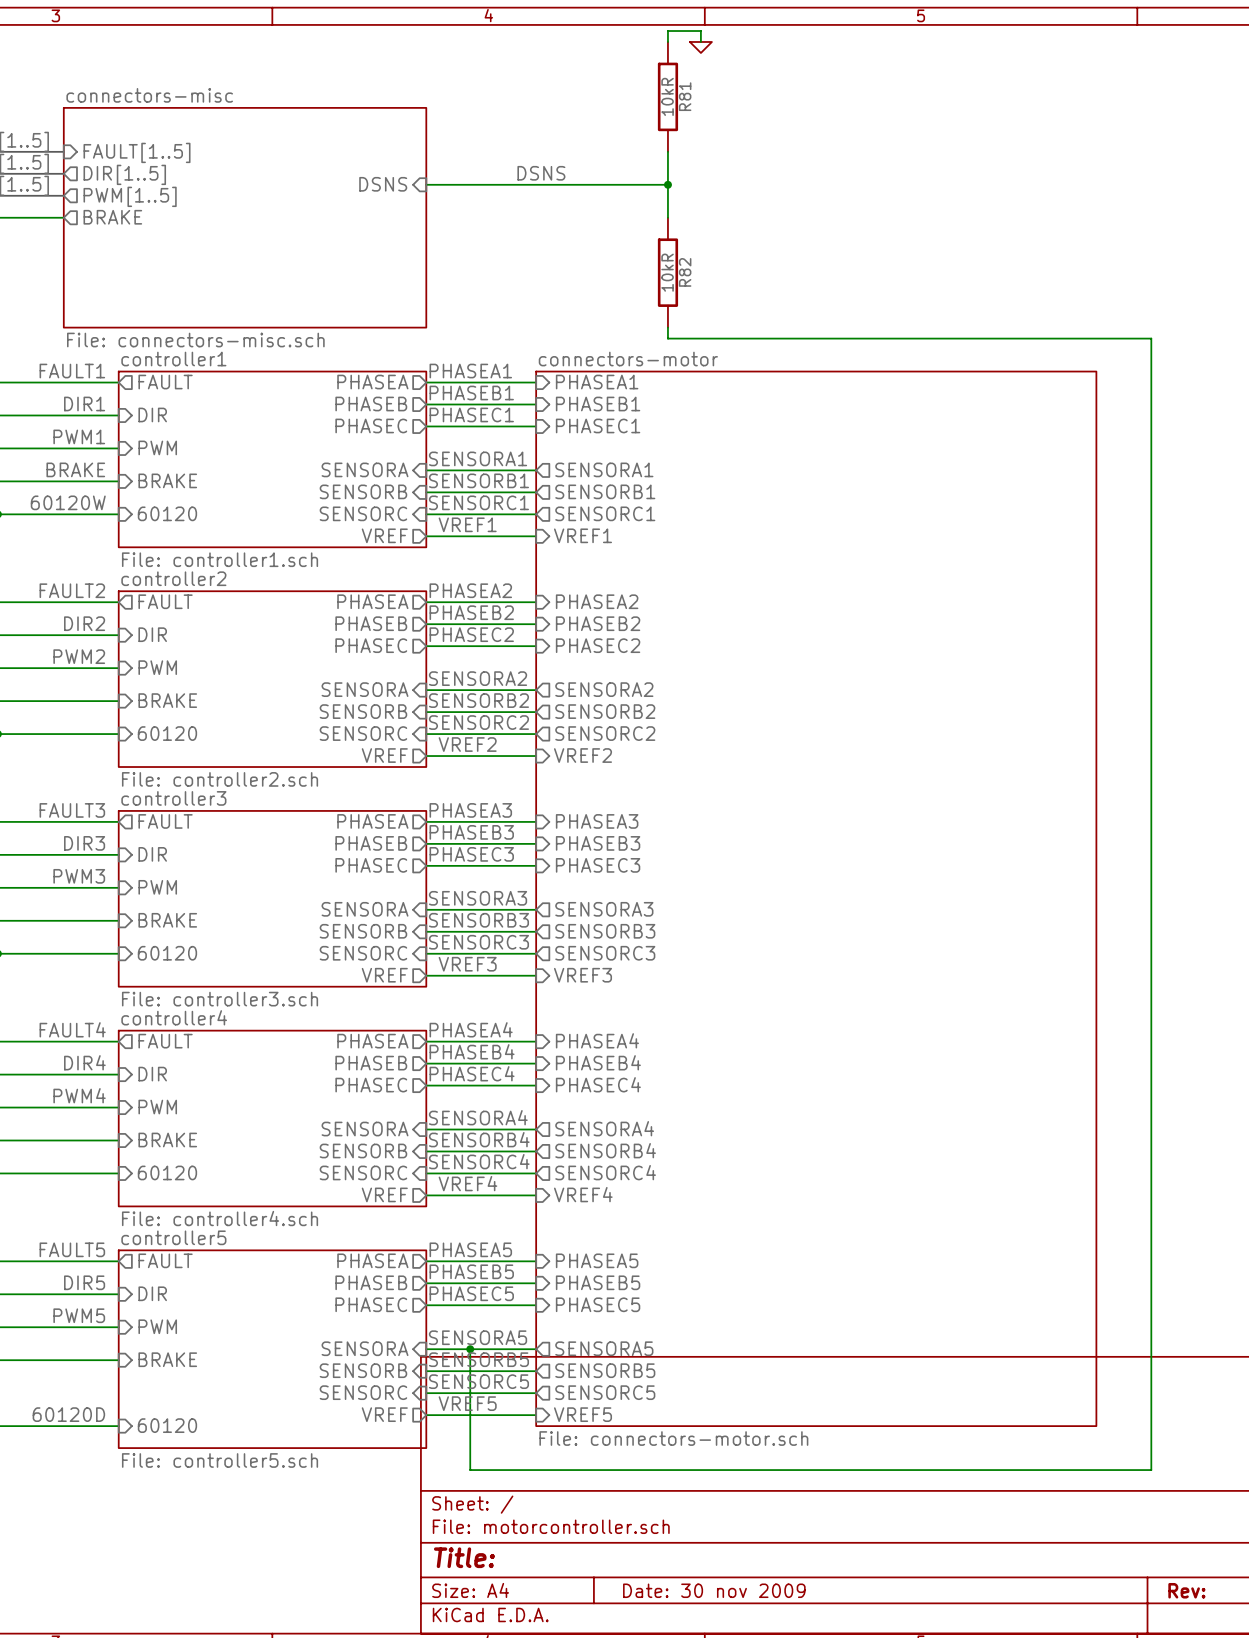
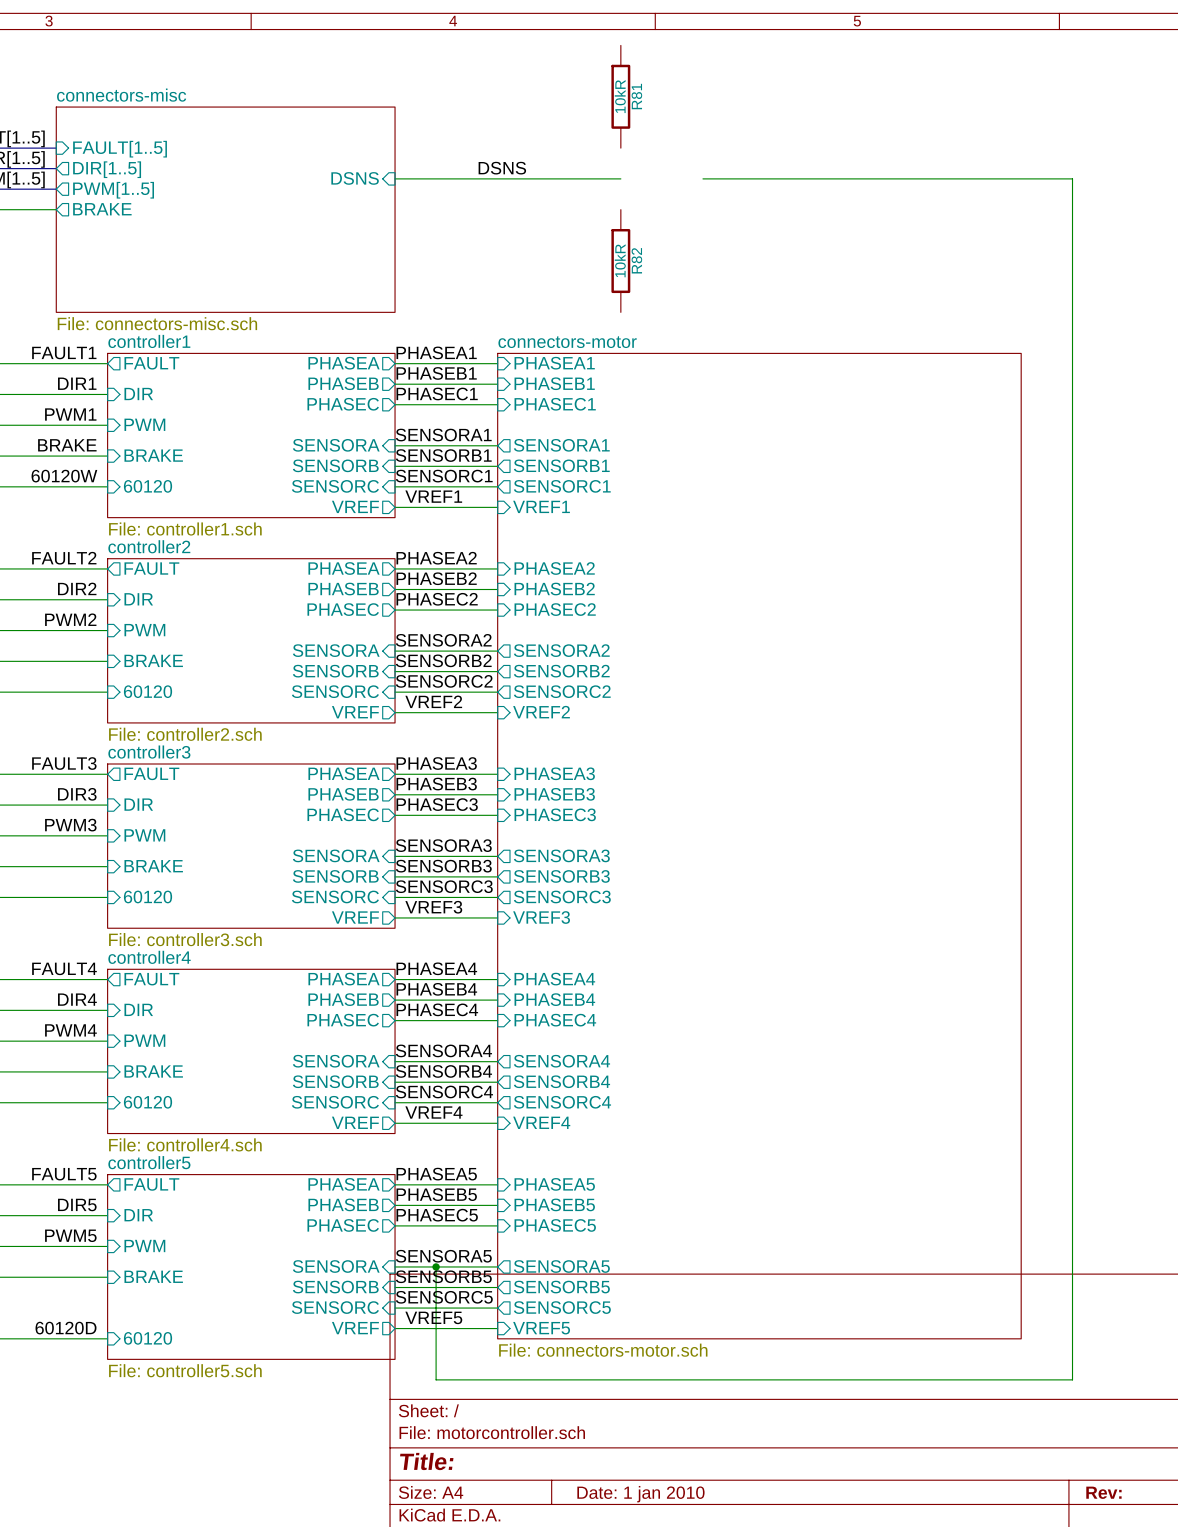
wire: (667, 41) (667, 31) (700, 31) (700, 41) -> none
power symbol: (700, 47) -> none
wire: (667, 151) (667, 217) -> none
junction: (667, 184) -> none
wire: (667, 327) (667, 338) (1151, 338) -> (702, 178) (1072, 178) (1072, 322)
title block: Date: 30 nov 2009 (714, 1590) -> Date: 1 jan 2010 (640, 1494)

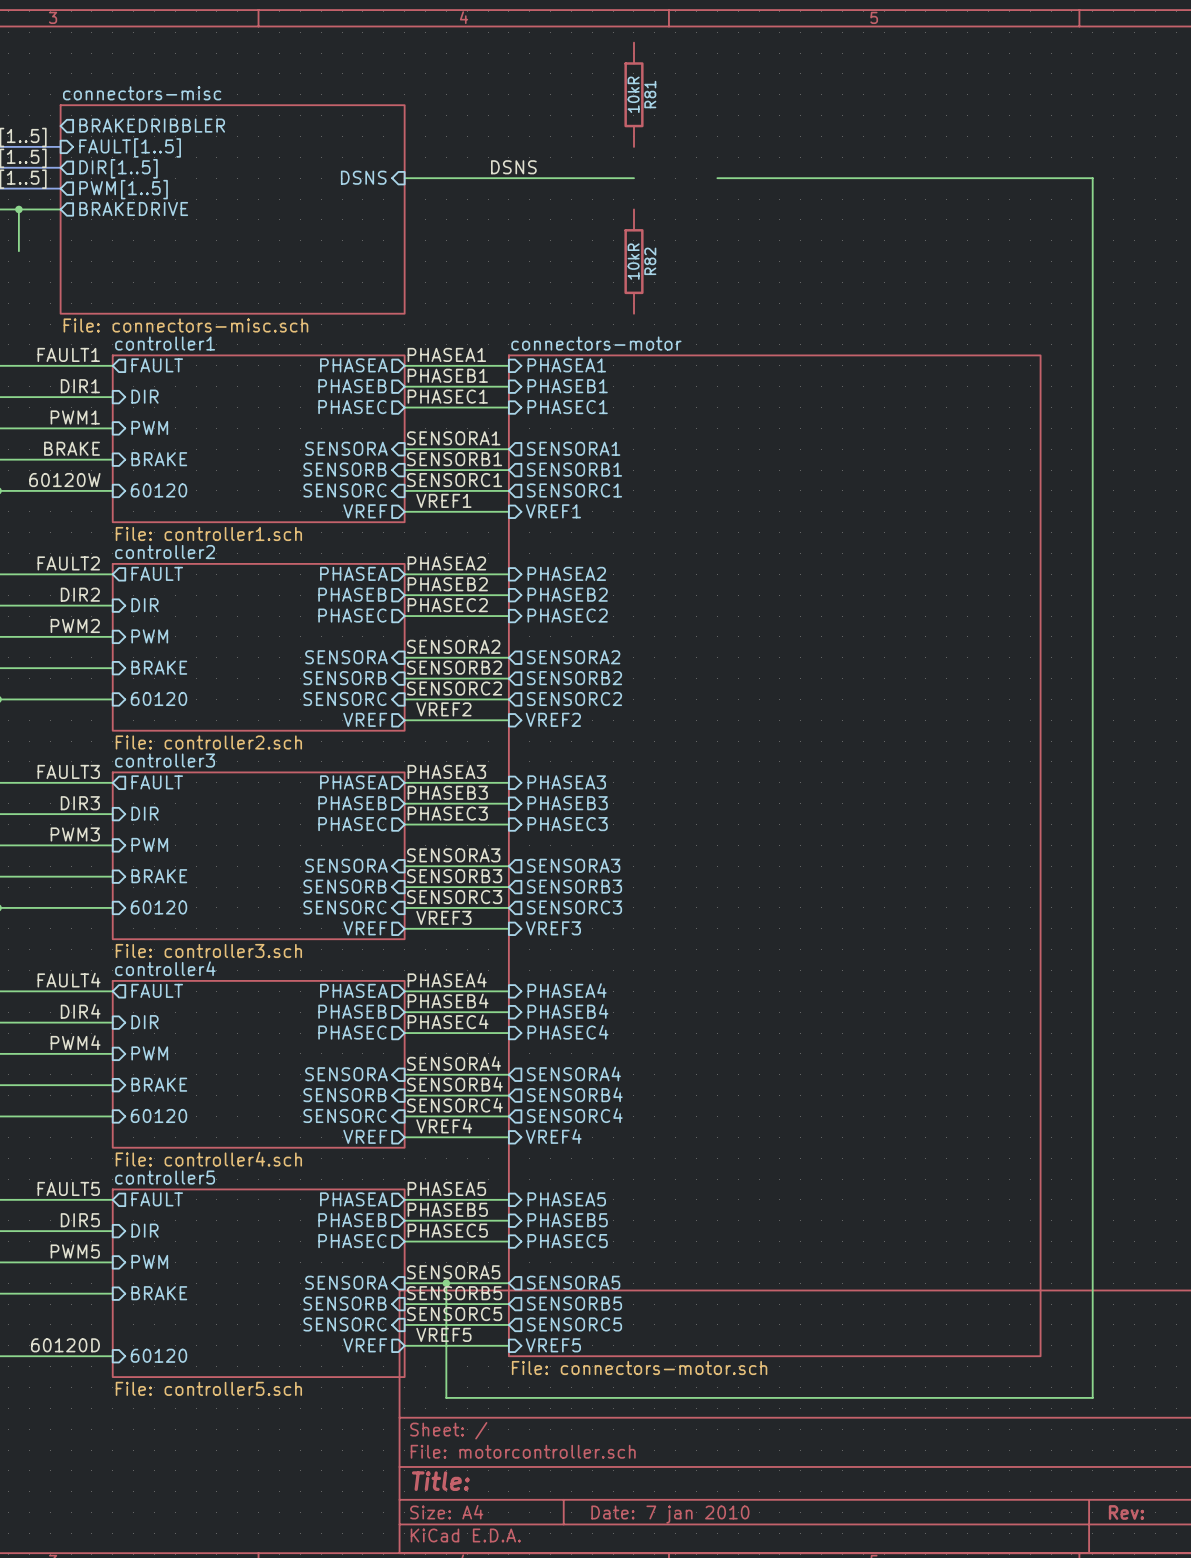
sheet pin: none -> BRAKEDRIBBLER (152, 125)
wire: none -> (18, 209) (18, 251)
junction: none -> (18, 209)
sheet pin: BRAKE (102, 209) -> BRAKEDRIVE (133, 208)
title block: Date: 1 jan 2010 (640, 1494) -> Date: 7 jan 2010 (670, 1514)

